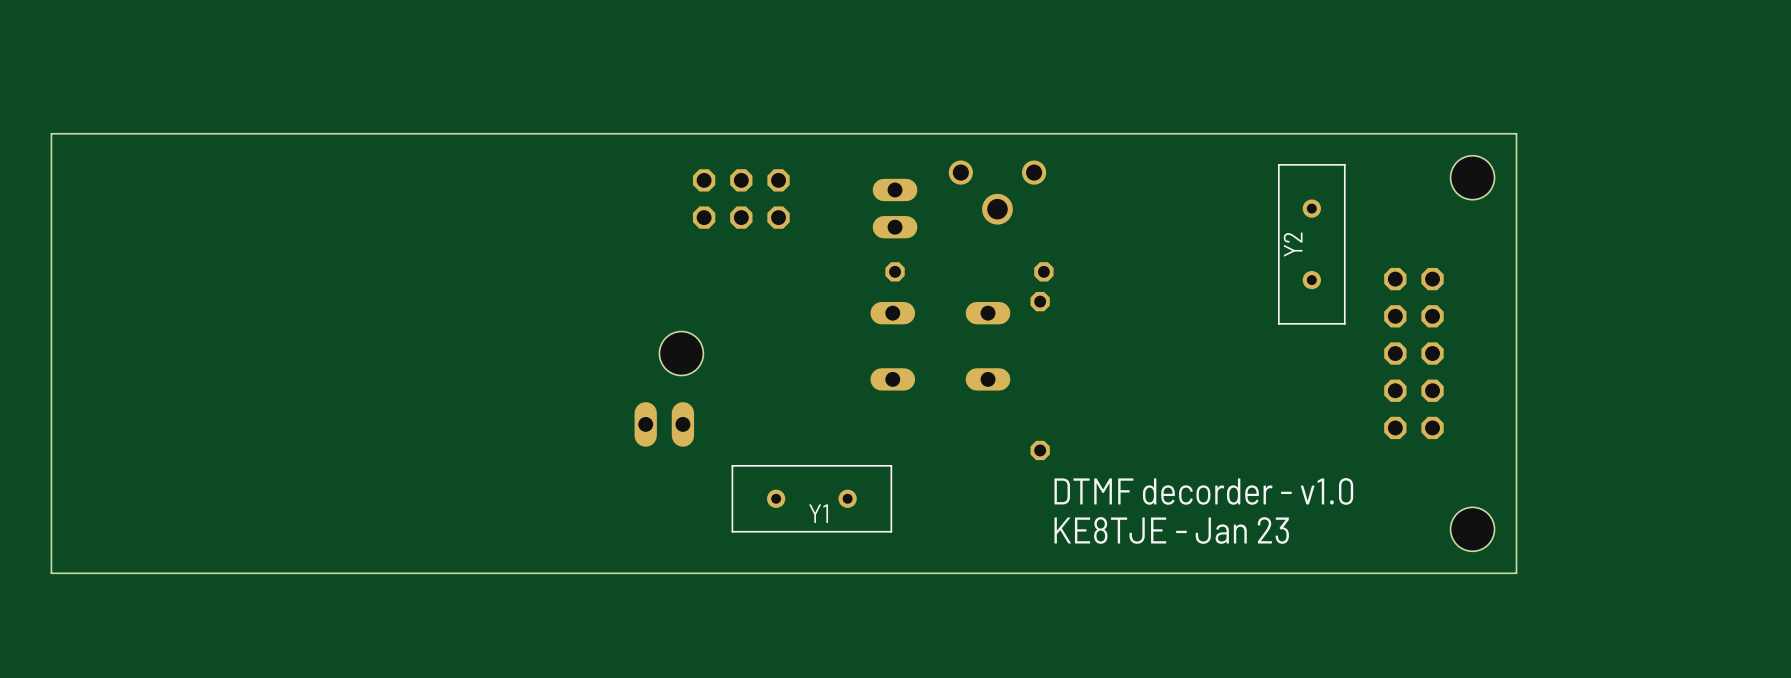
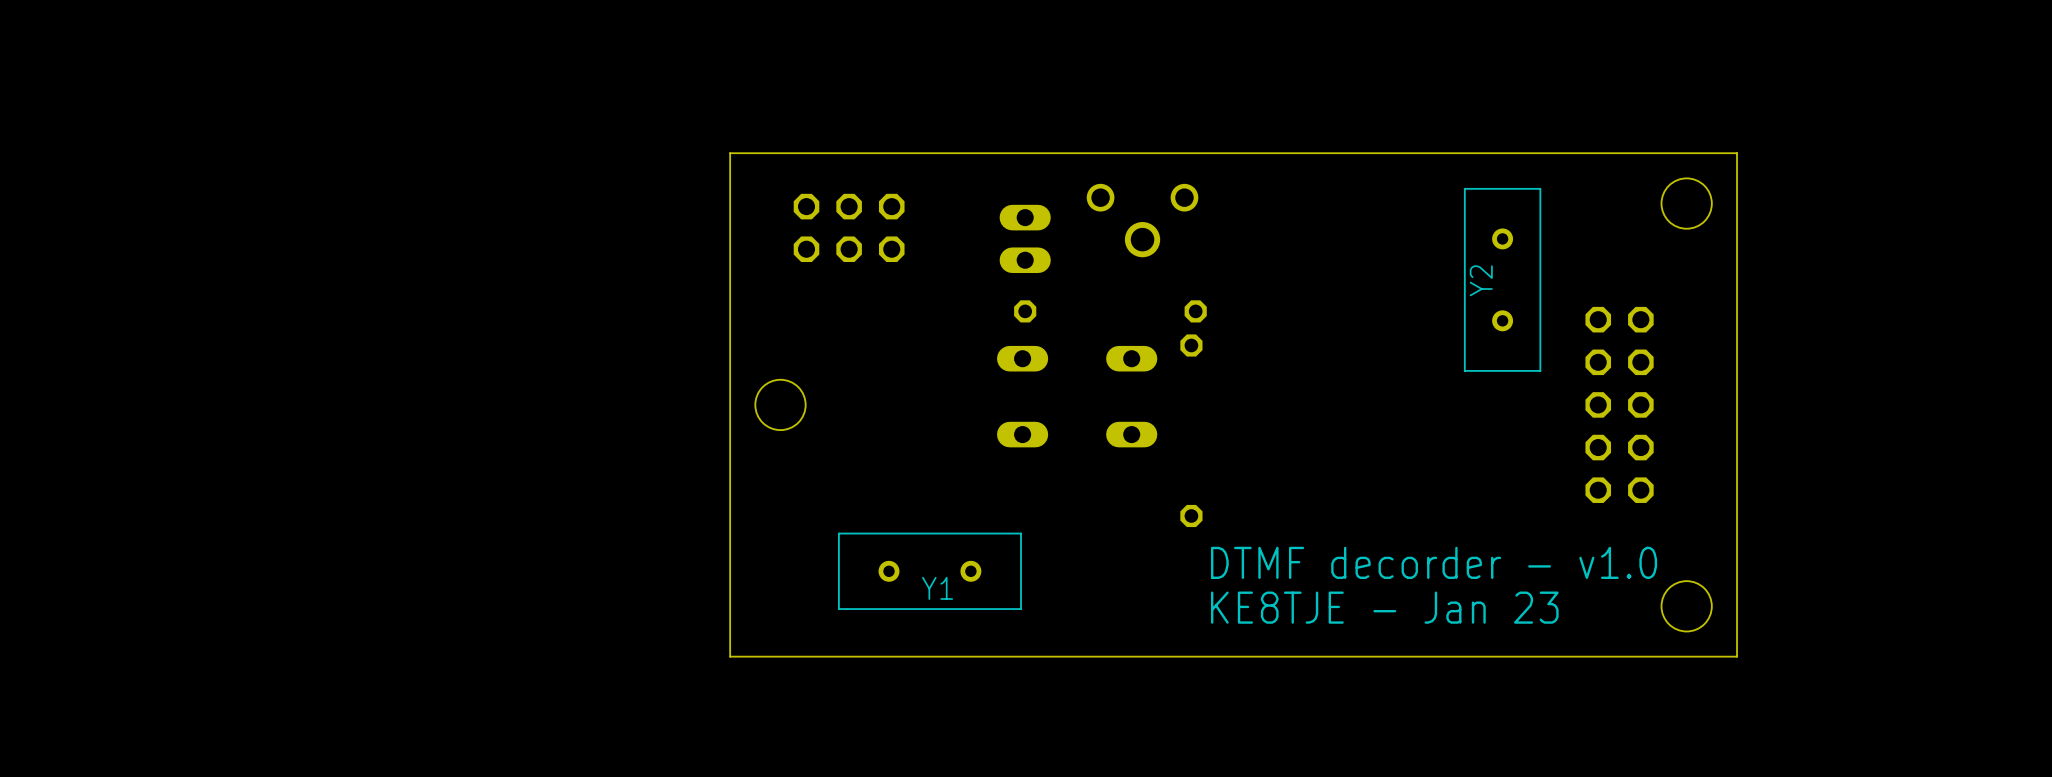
board edge: (637, 133) (51, 133) (51, 573) (637, 573) -> (730, 153) (730, 656)
part: (664, 424) -> none

